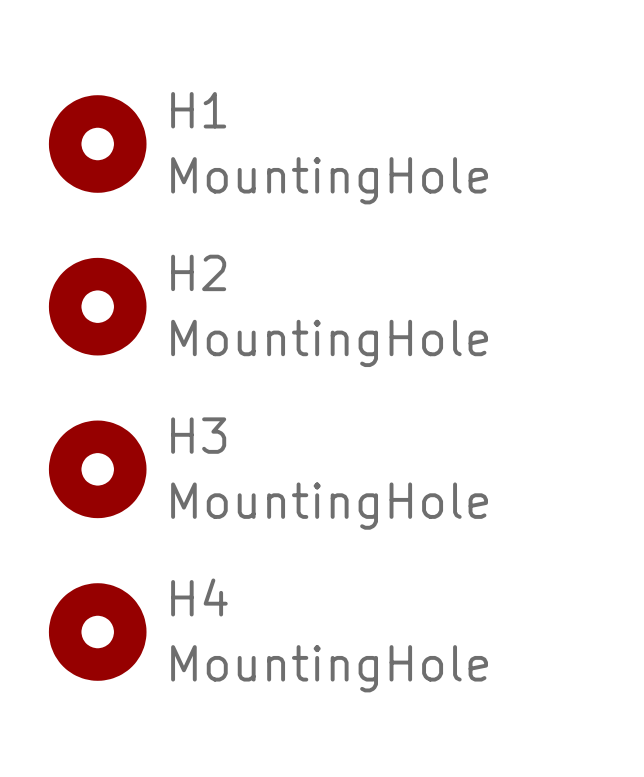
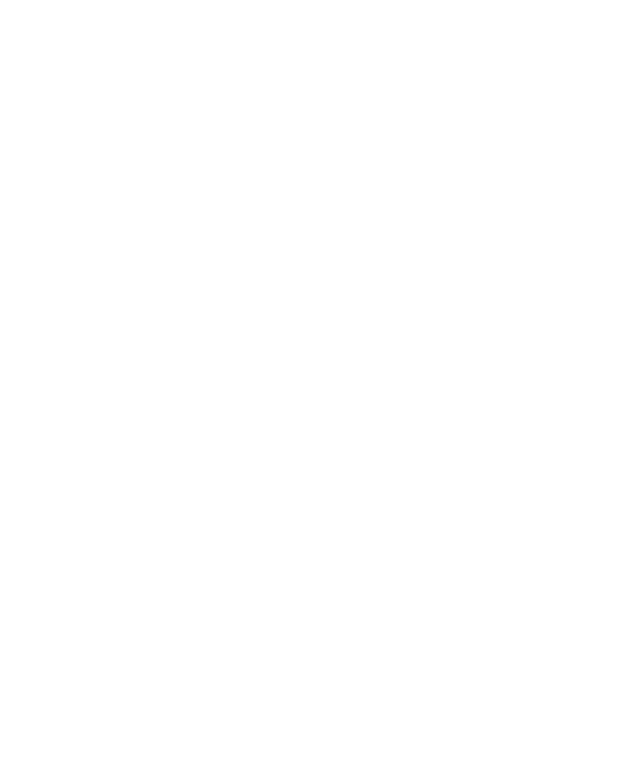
H1: MountingHole (97, 144) -> none
H2: MountingHole (97, 306) -> none
H3: MountingHole (97, 469) -> none
H4: MountingHole (97, 632) -> none

